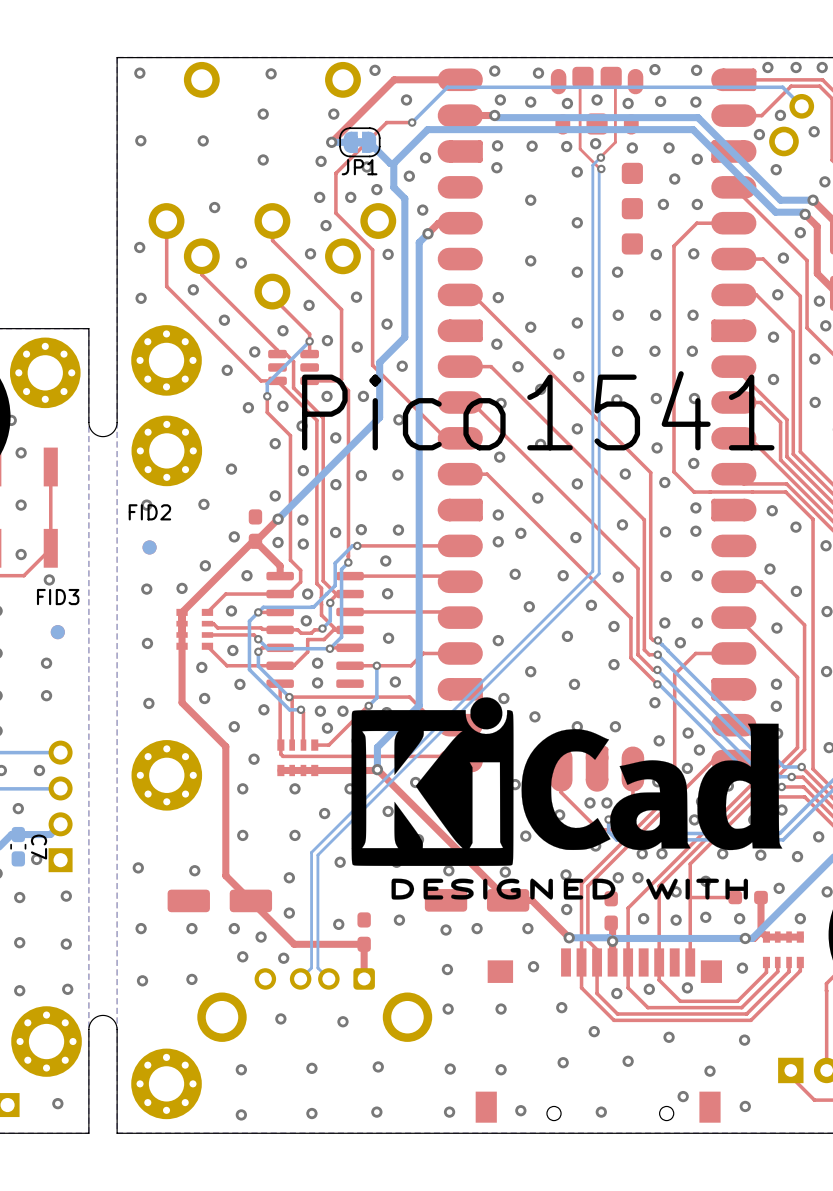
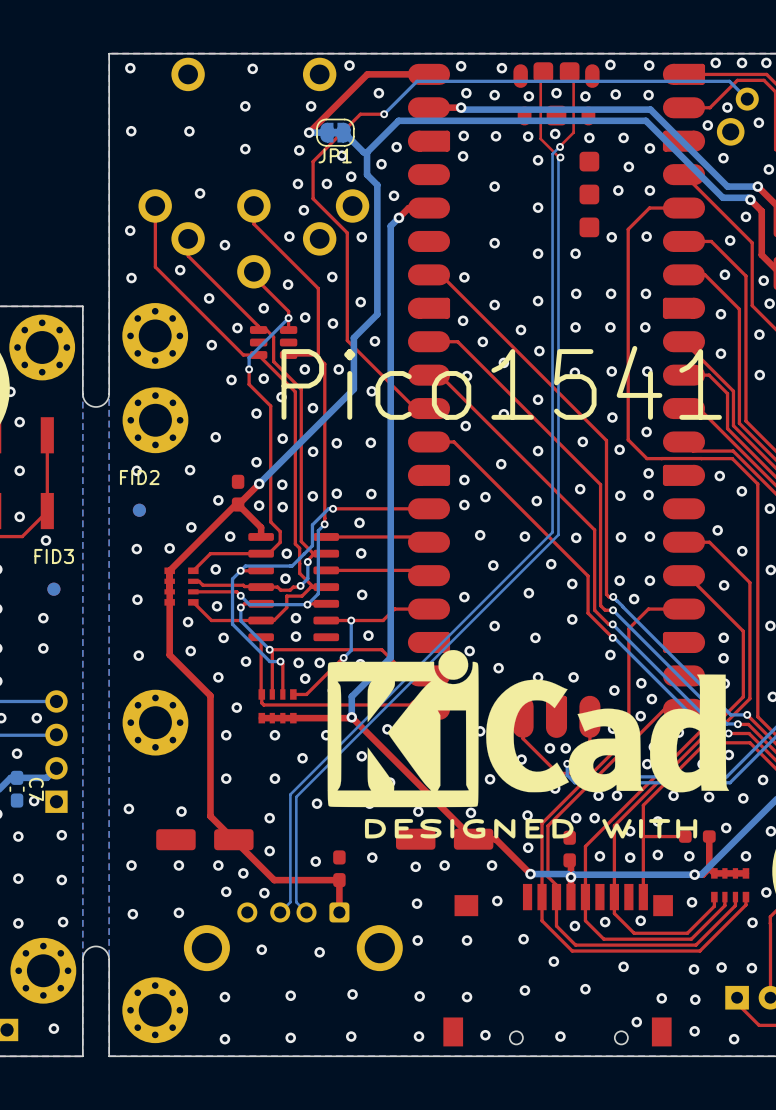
via: none -> (766, 892)
via: none -> (752, 922)
via: none -> (721, 967)
via: none -> (751, 968)
via: none -> (695, 999)
via: none -> (734, 1039)

